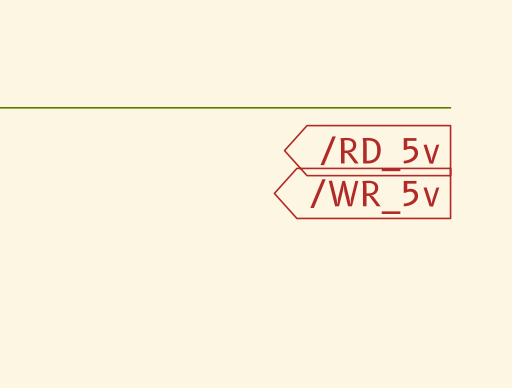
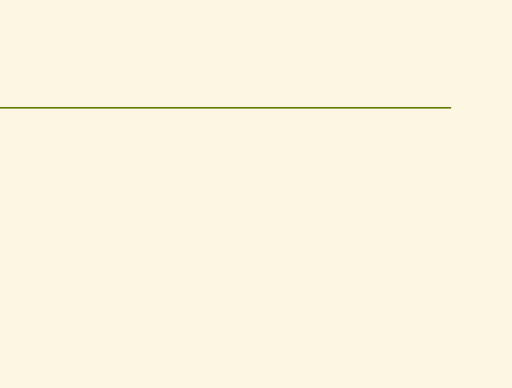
global label: /RD_5v (379, 153) -> none
global label: /WR_5v (374, 196) -> none

